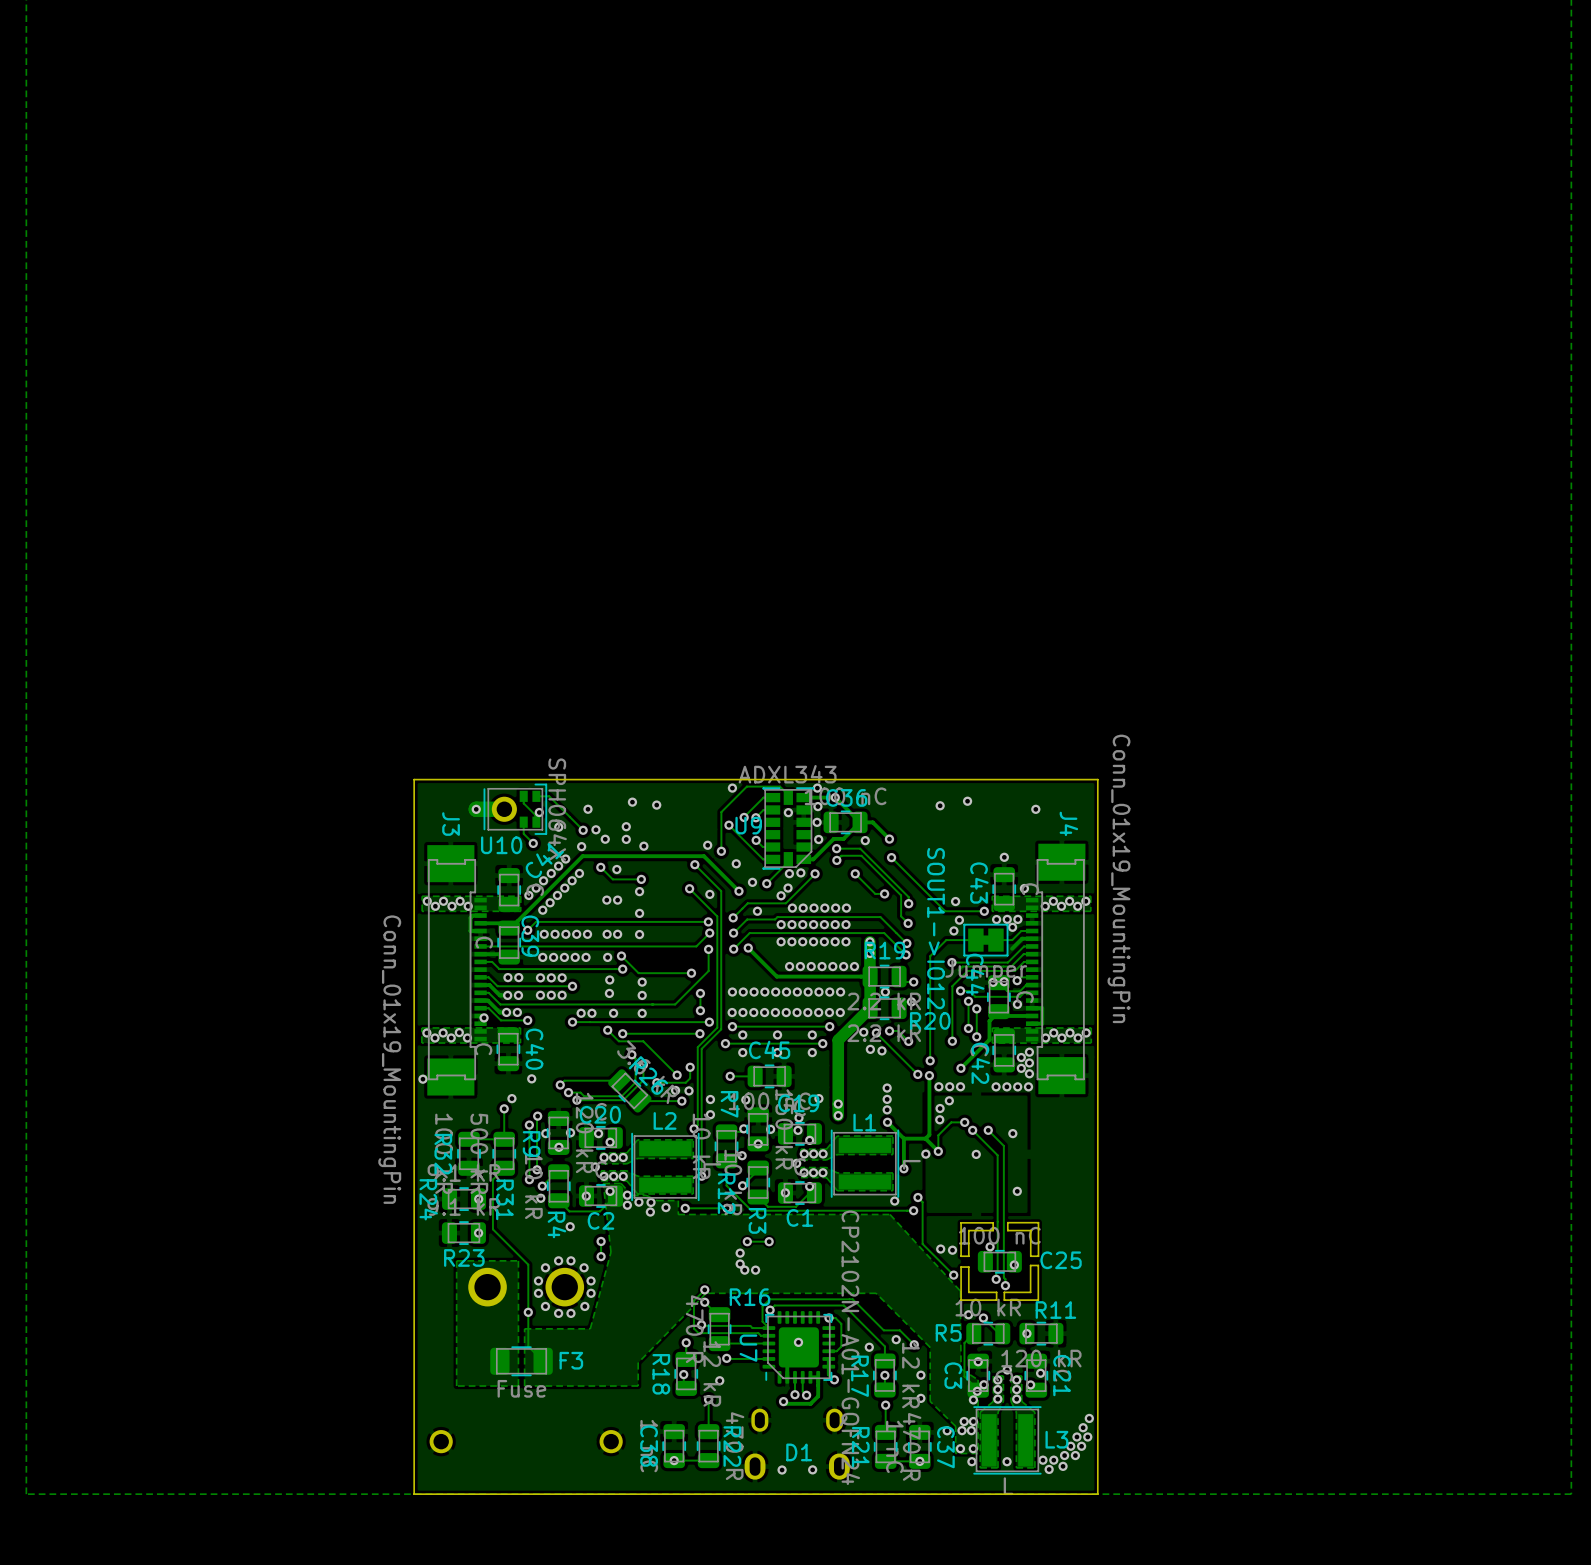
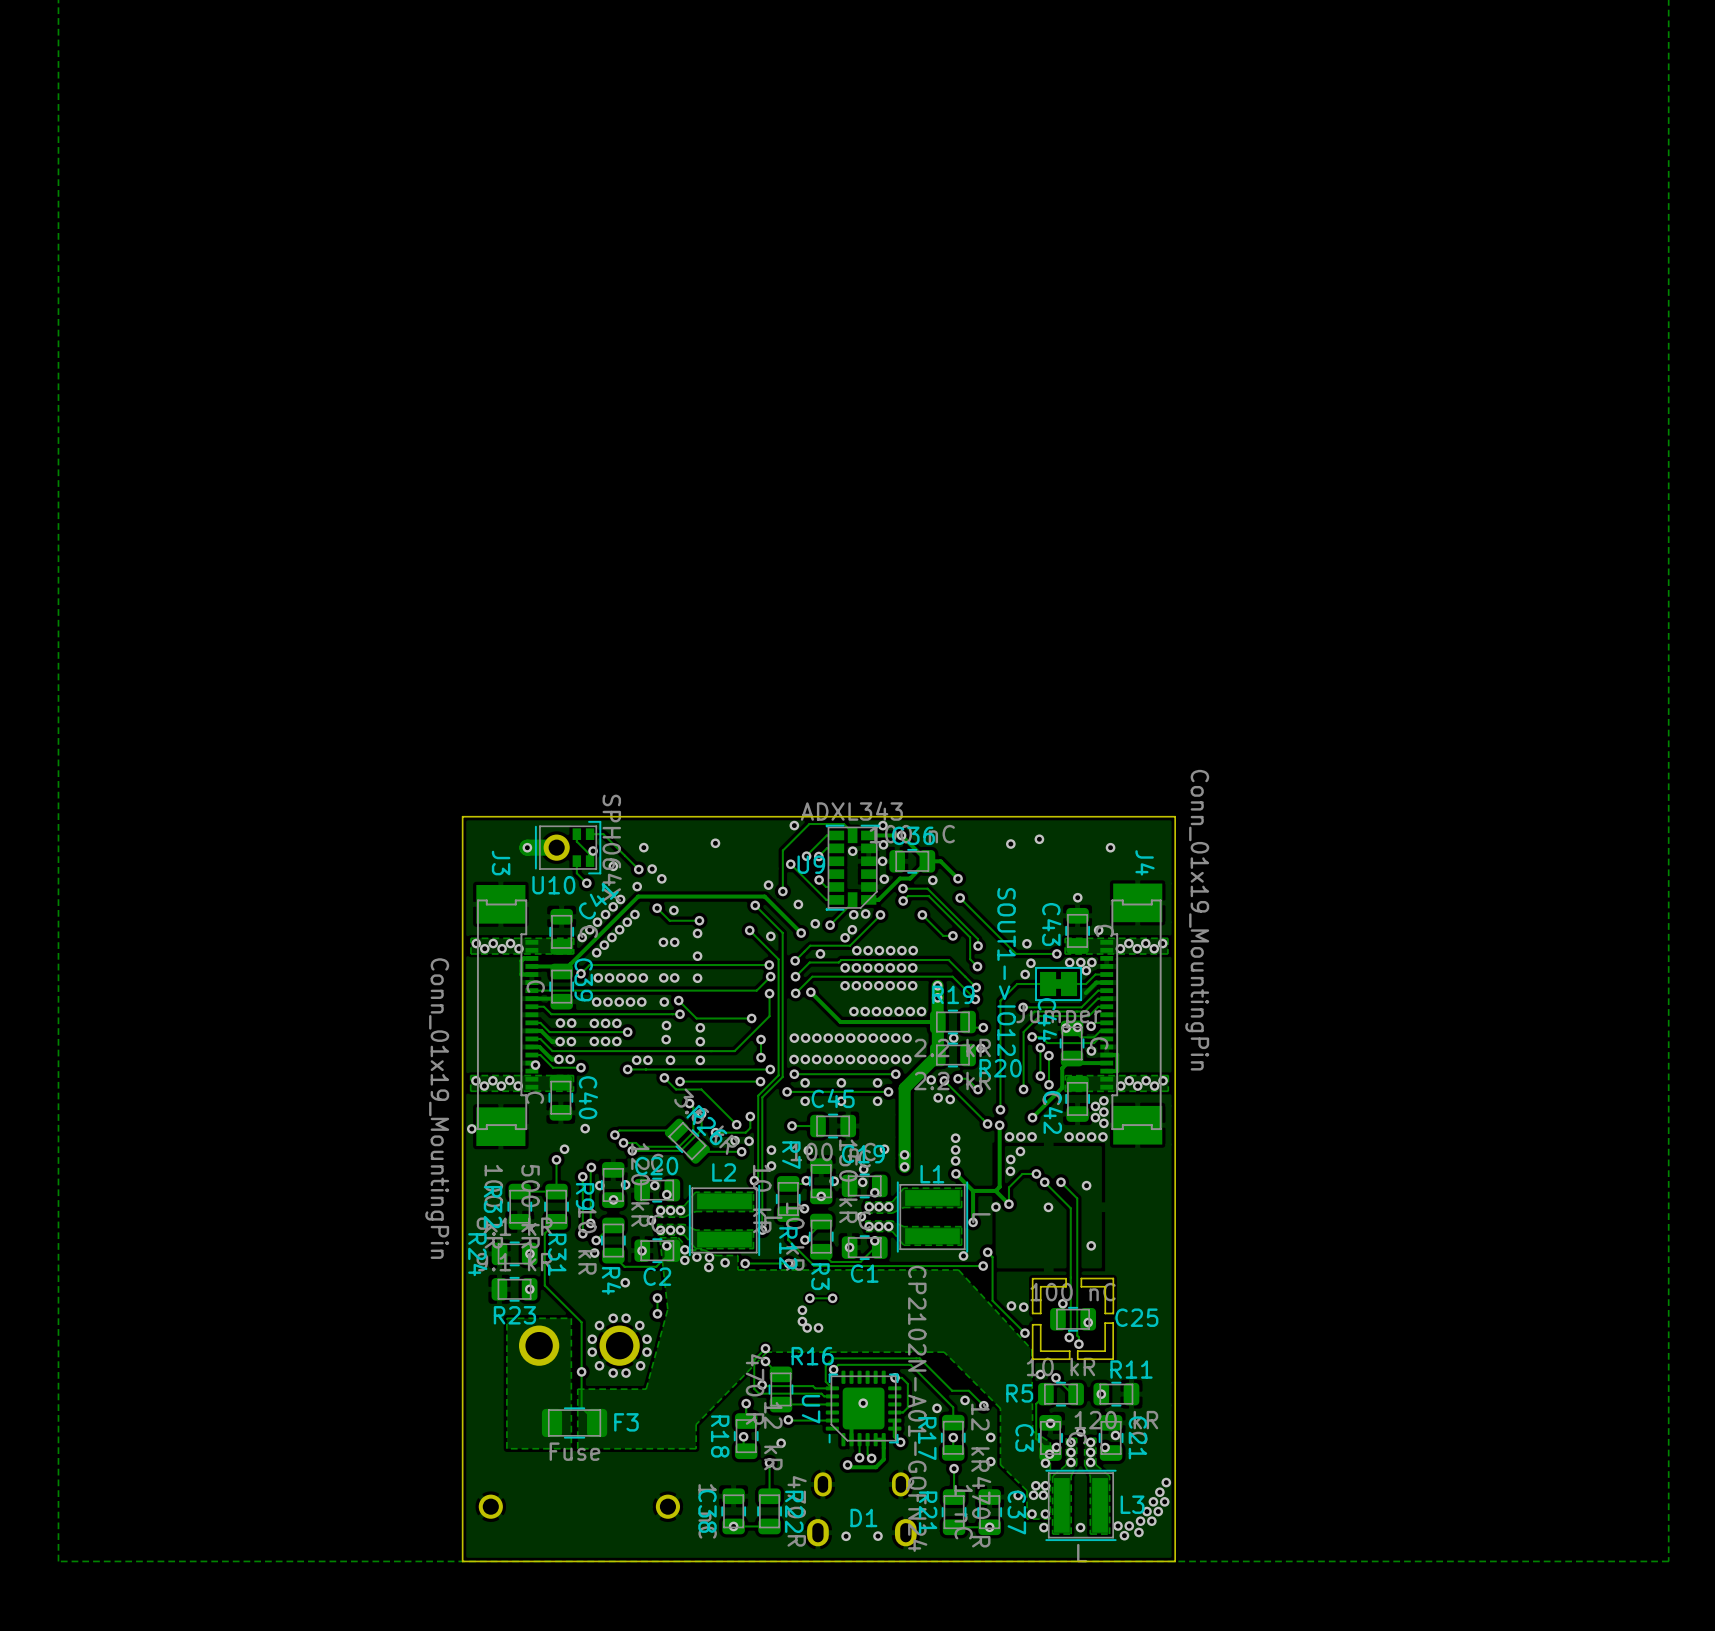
via: (632, 802) -> none
via: (626, 826) -> none
via: (626, 839) -> none
via: (643, 846) -> none

